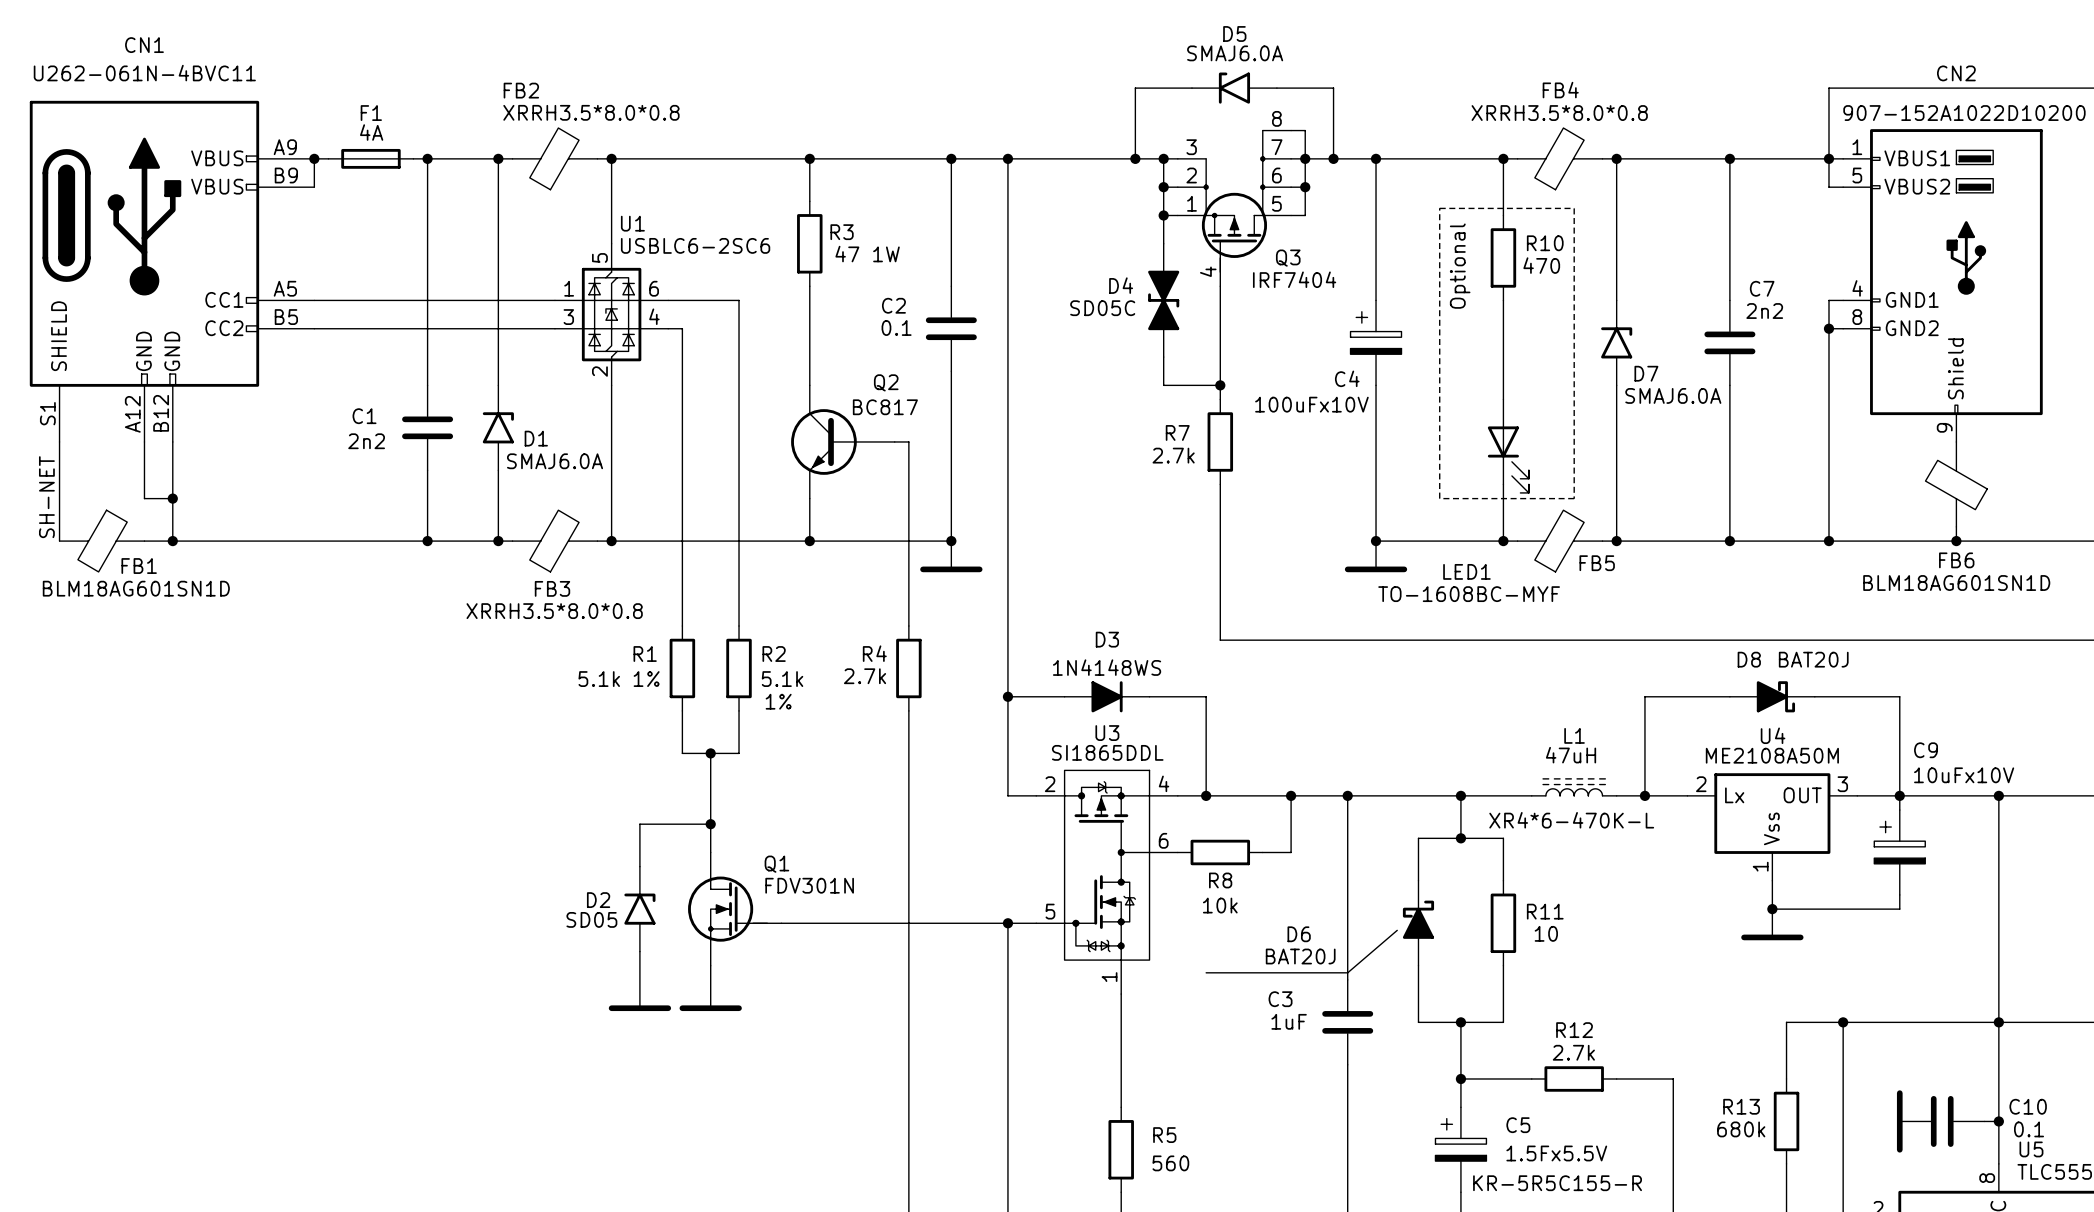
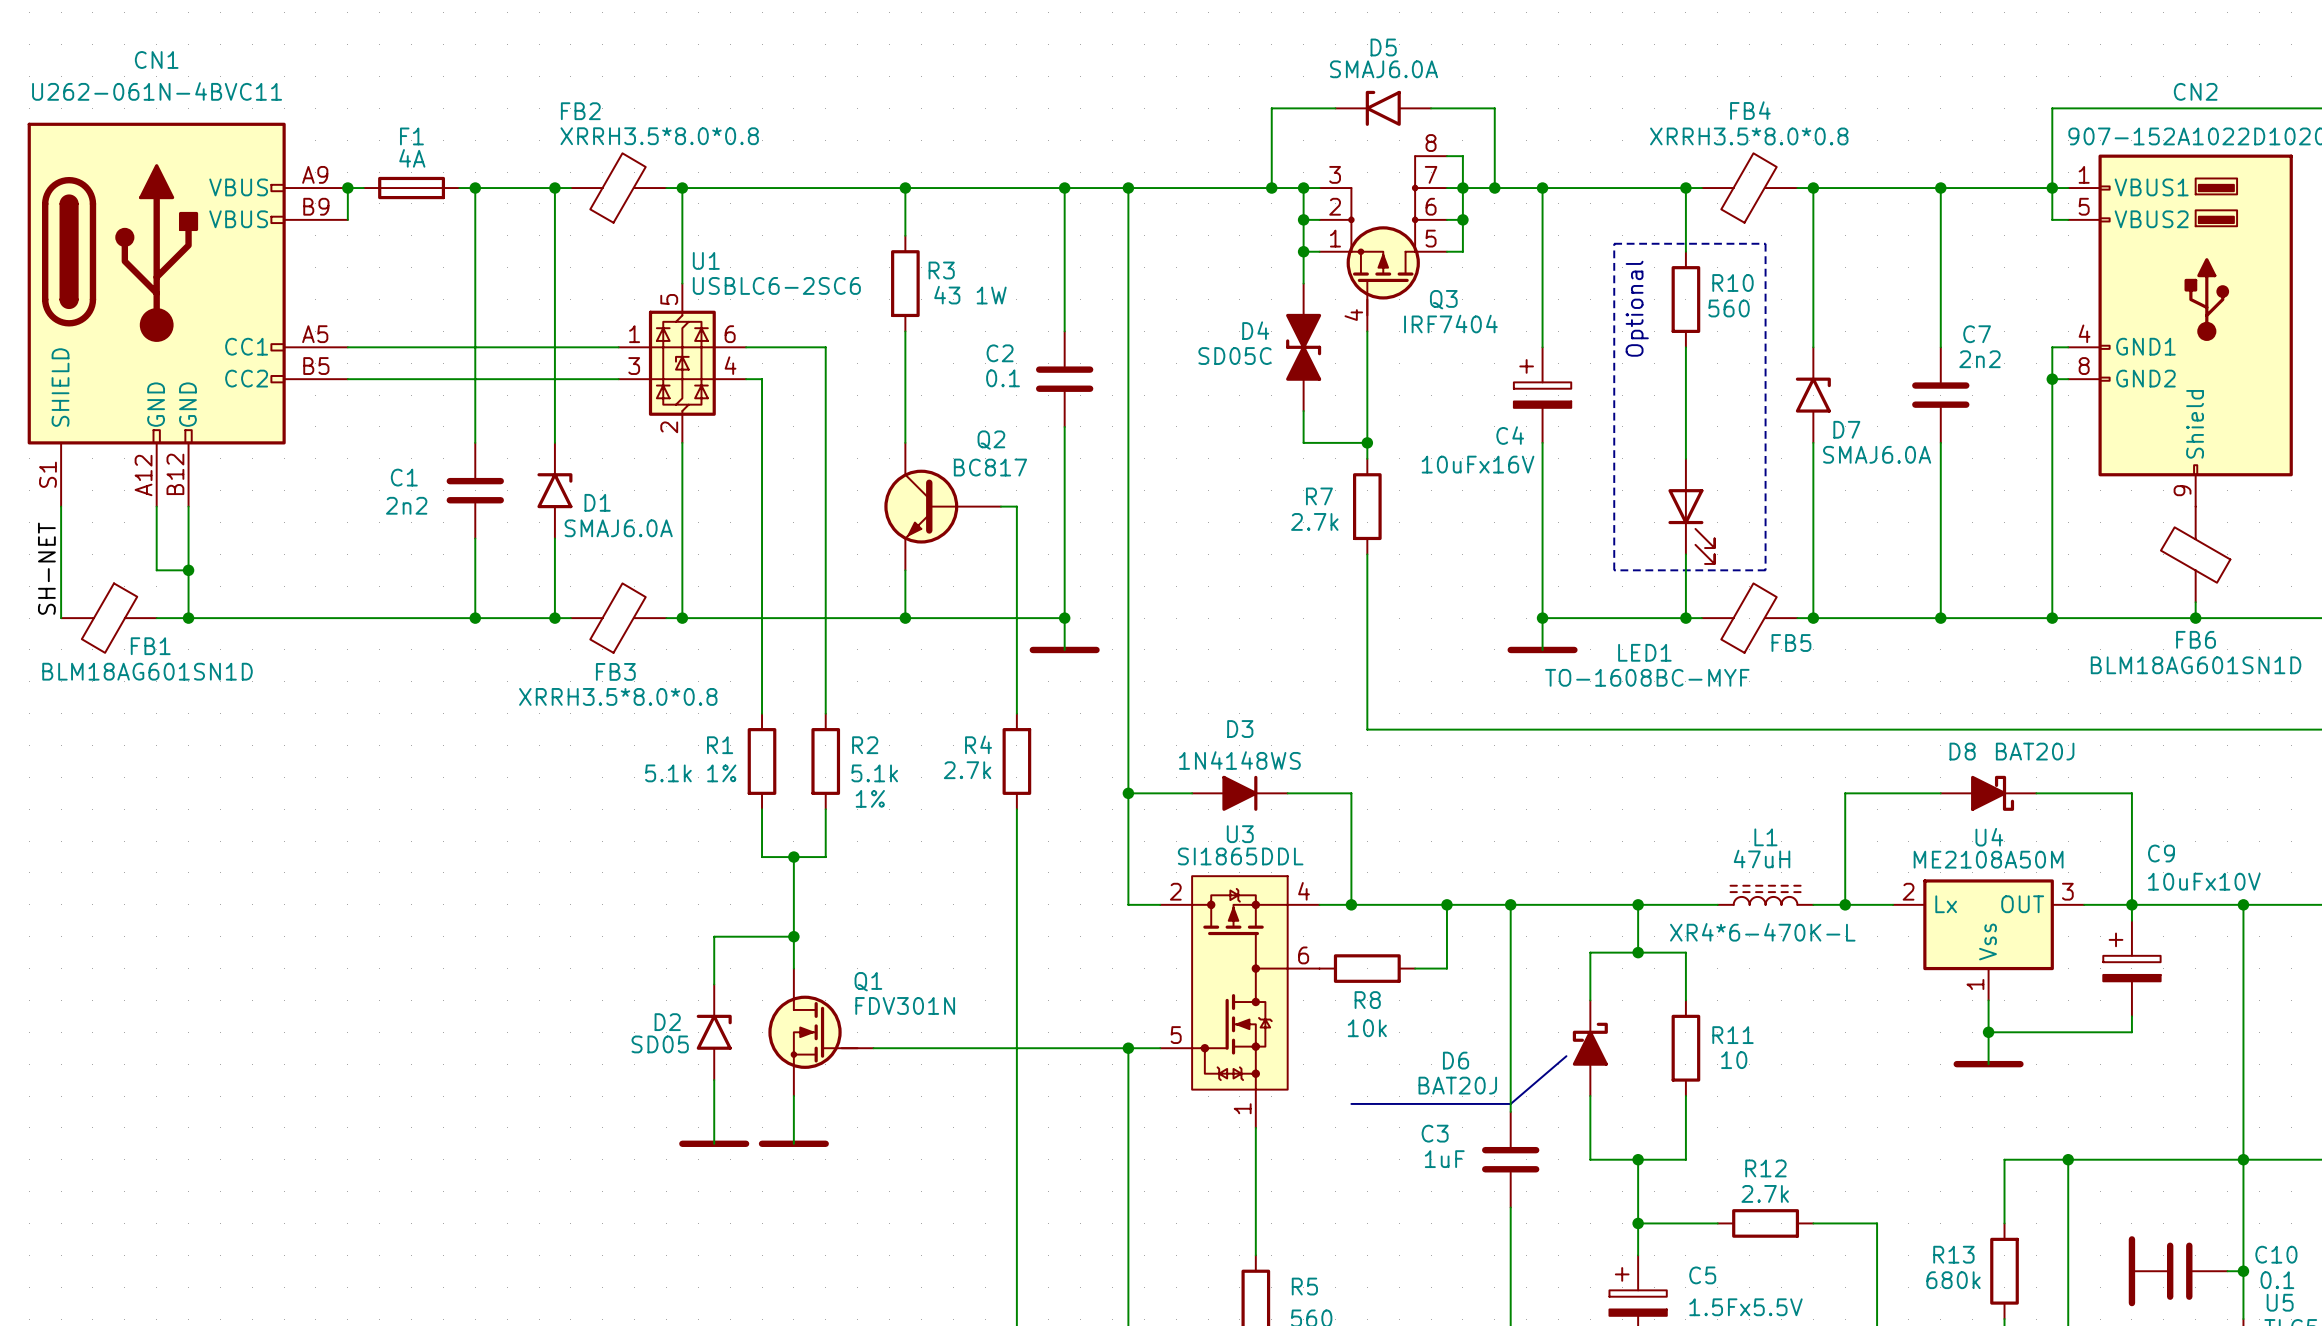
R3 value: 47 1W (867, 254) -> 43 1W (970, 295)
R10 value: 470 (1541, 265) -> 560 (1729, 308)
C4 value: 100uFx10V (1311, 404) -> 10uFx16V (1478, 464)

